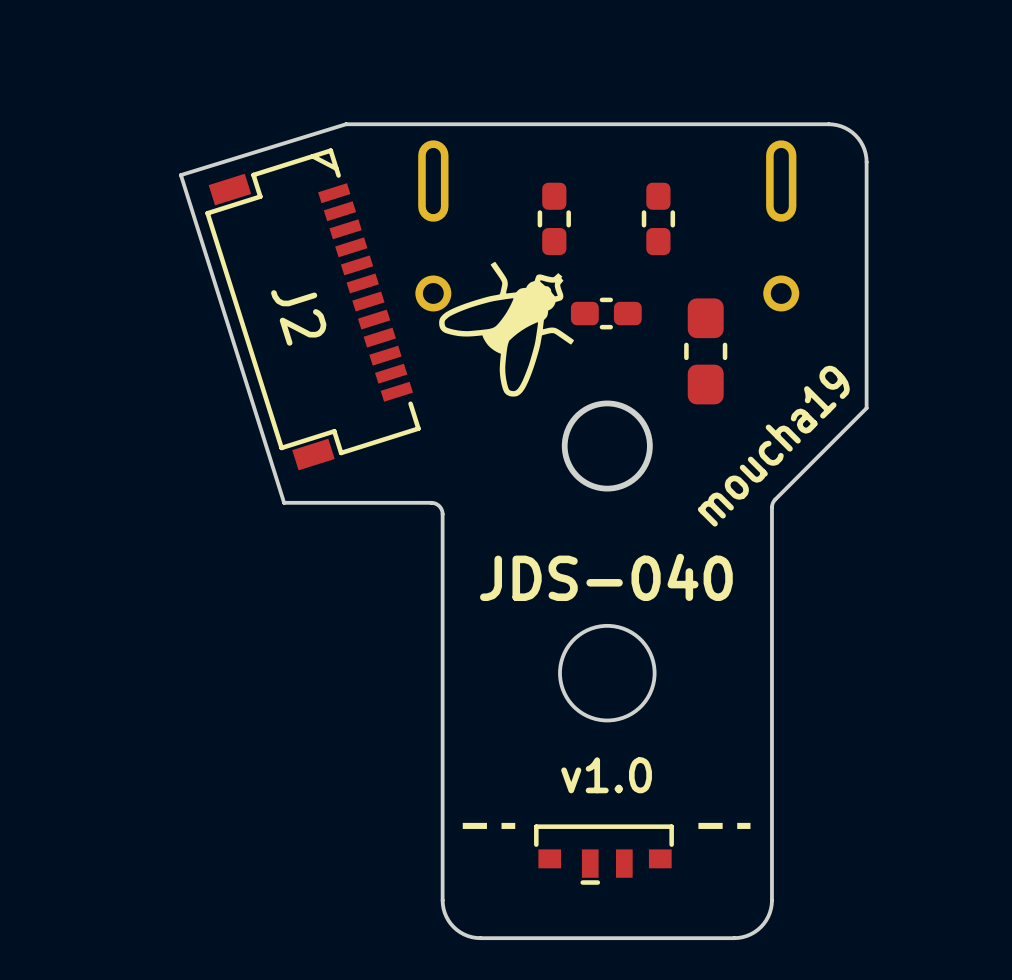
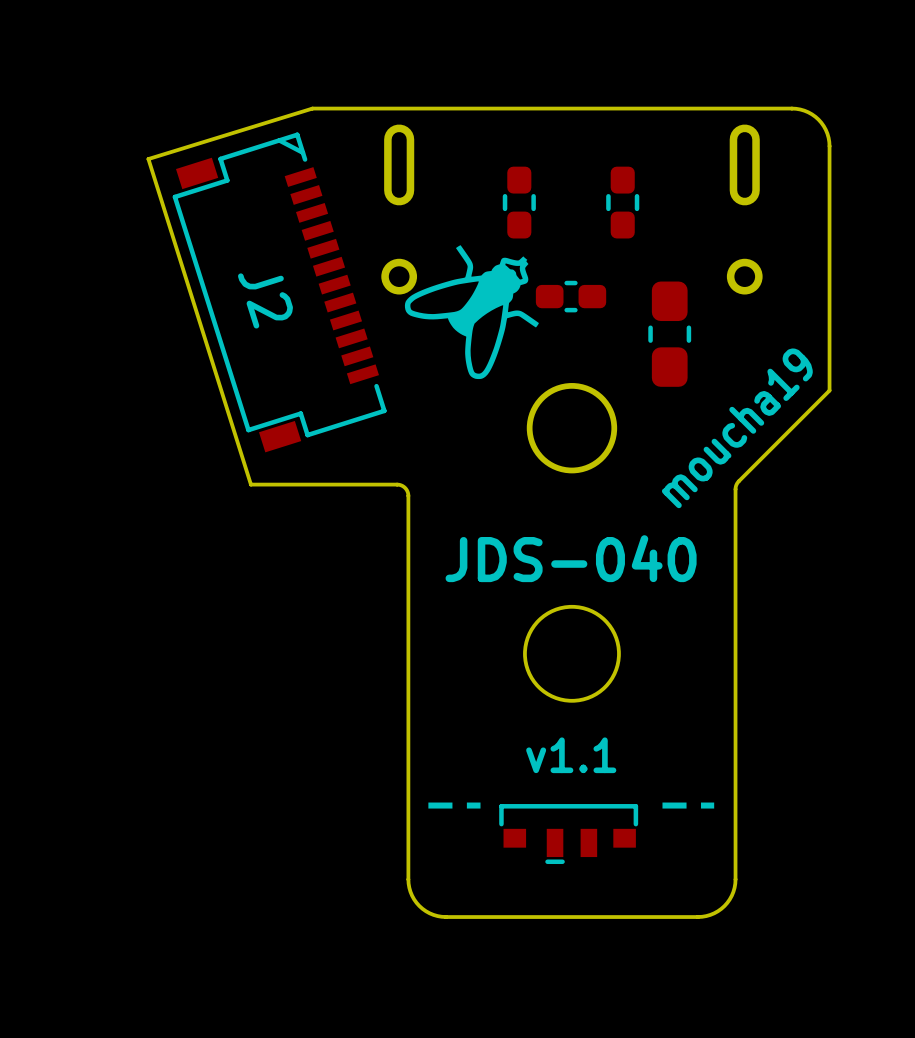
text: v1.0 (606, 775) -> v1.1 (571, 755)

